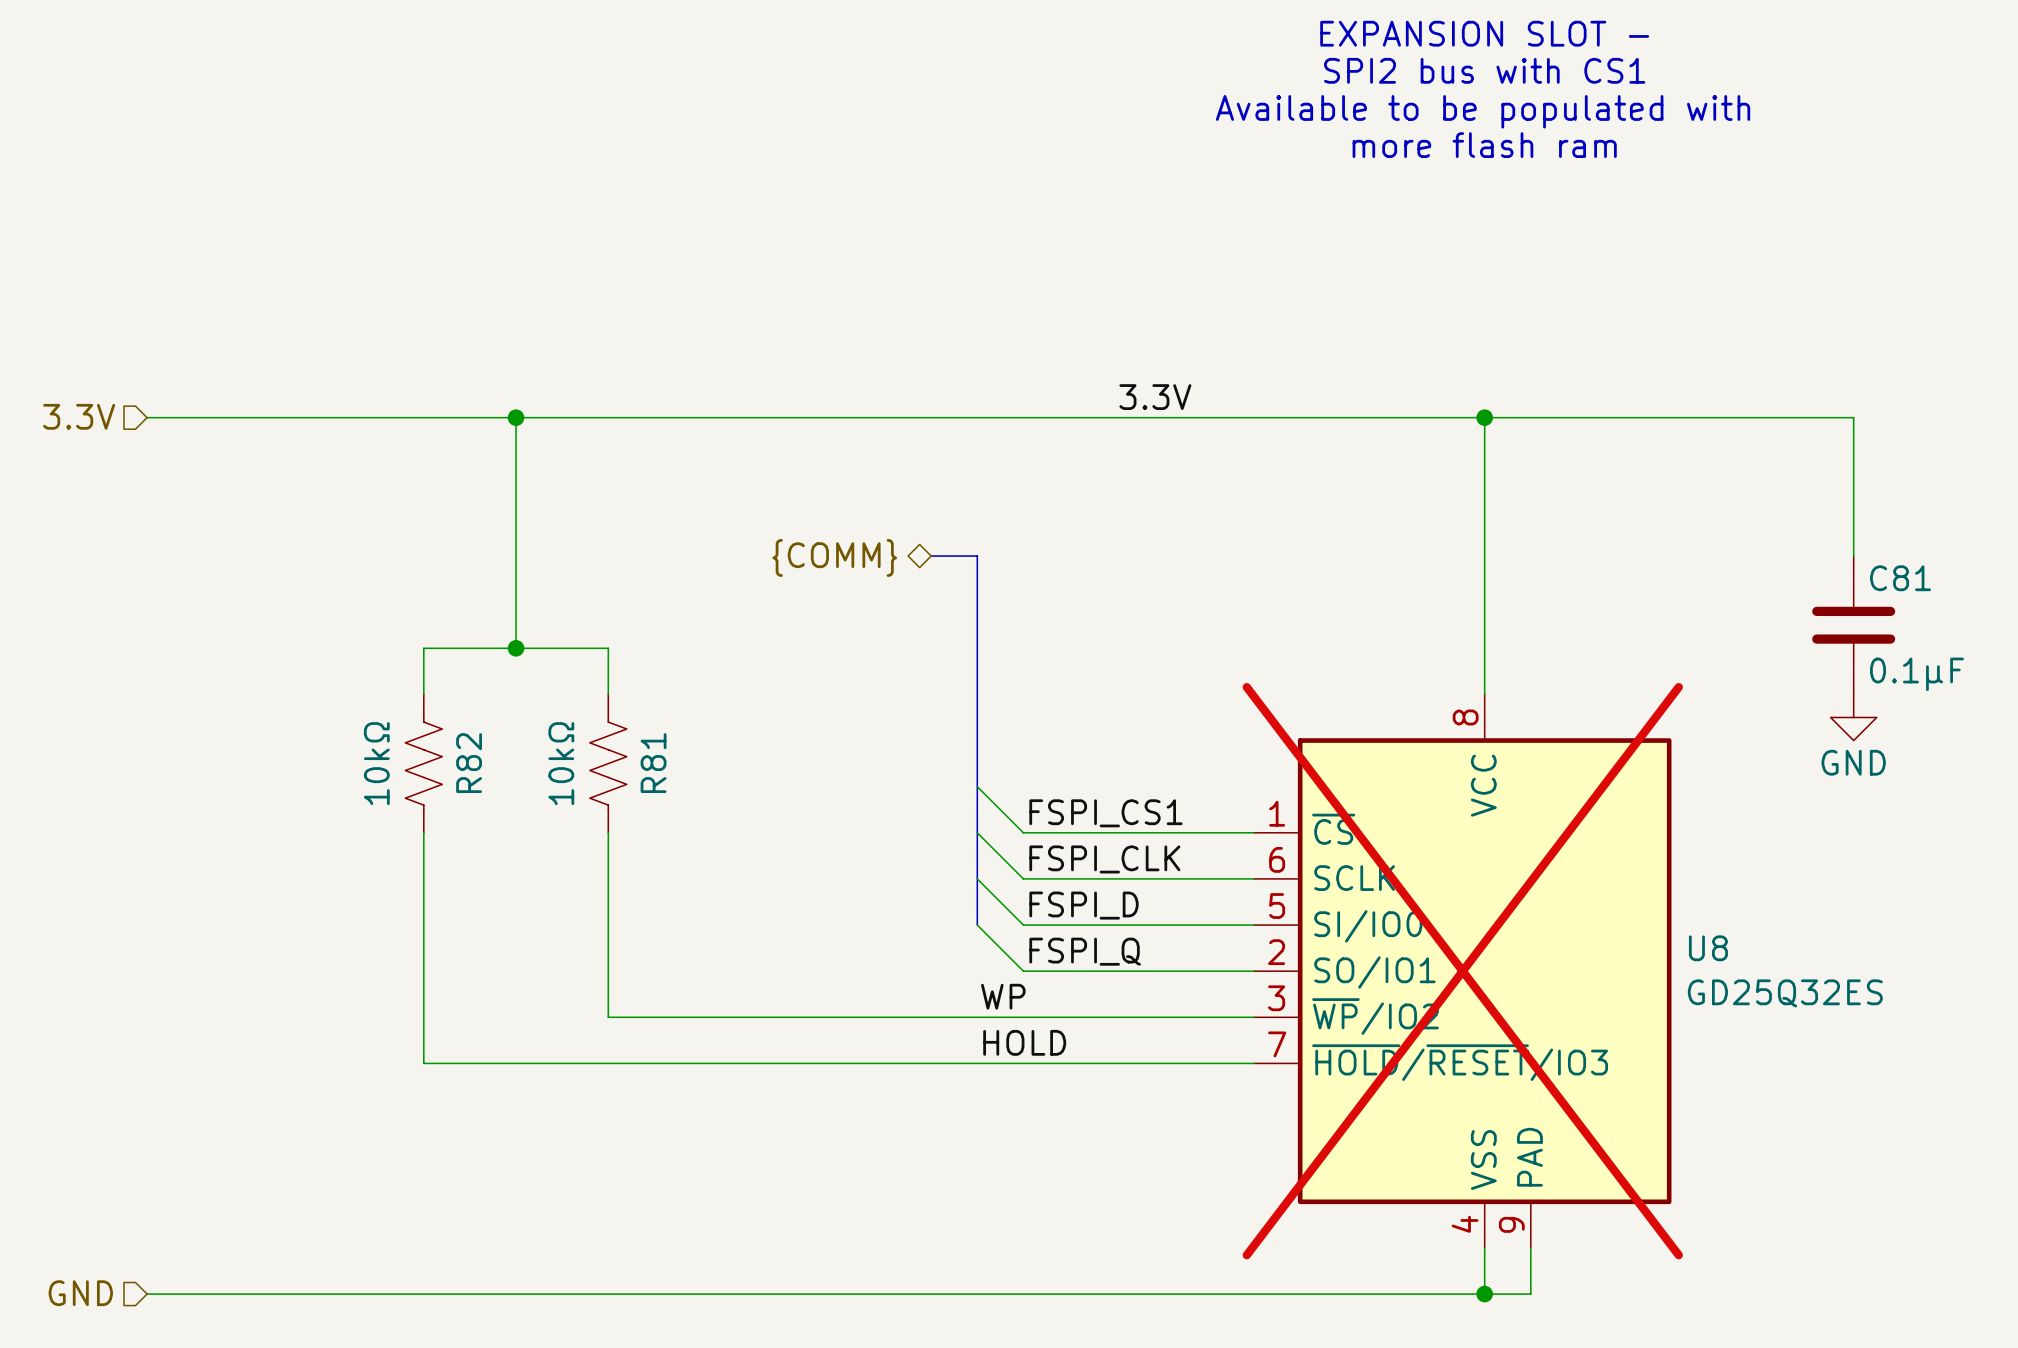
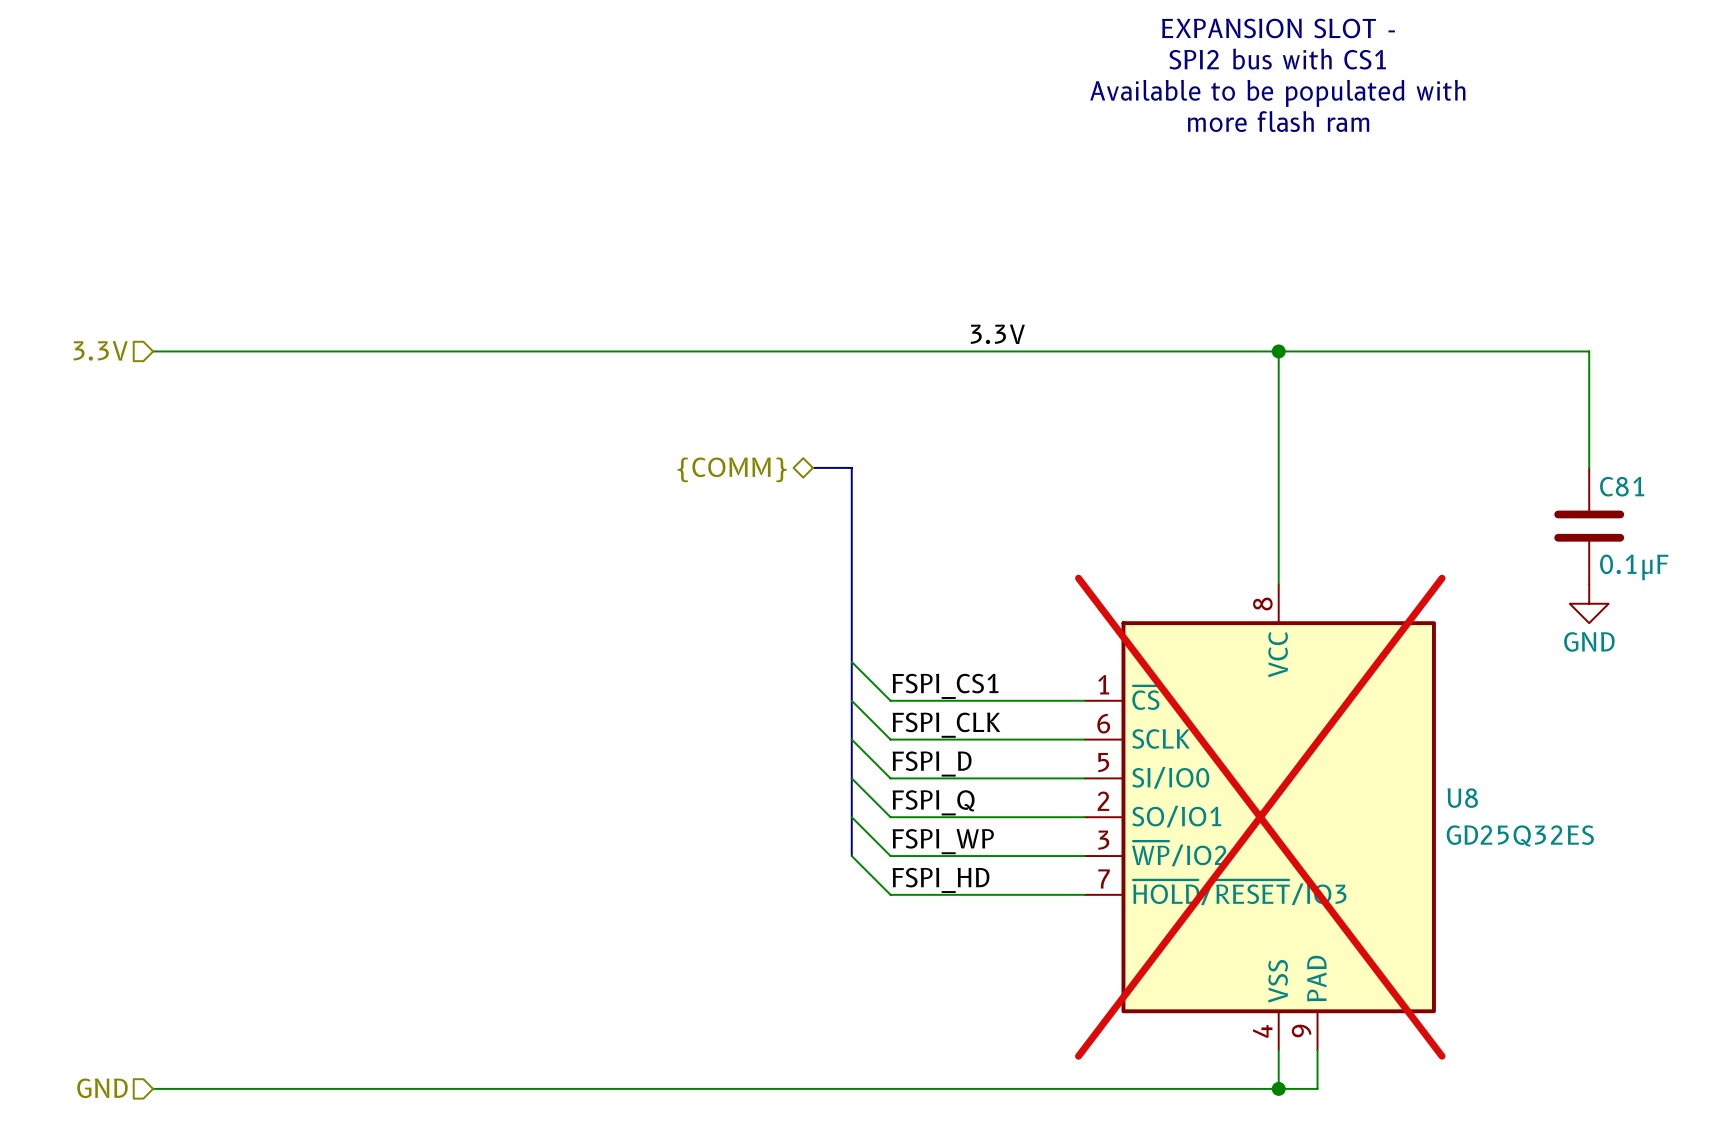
wire: (516, 417) (516, 648) -> none
junction: (516, 417) -> none
junction: (516, 648) -> none
wire: (423, 694) (423, 648) (608, 648) (608, 694) -> none
R82: 10kΩ (423, 763) -> none
R81: 10kΩ (608, 763) -> none
wire: (423, 832) (423, 1063) (1023, 1063) -> (851, 856) (890, 894)
wire: (608, 832) (608, 1017) (1023, 1017) -> (851, 817) (890, 856)
bus: none -> (851, 778) (851, 856)
label: WP (1003, 996) -> none
label: none -> FSPI_WP (943, 841)
label: HOLD (1024, 1042) -> none
label: none -> FSPI_HD (941, 880)

